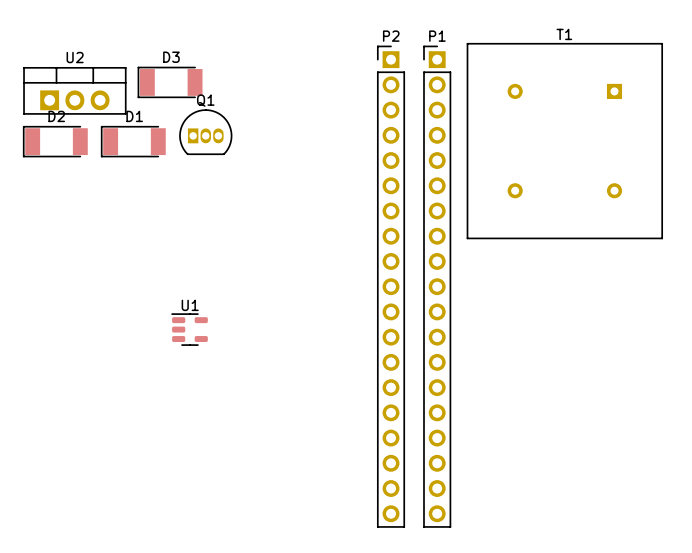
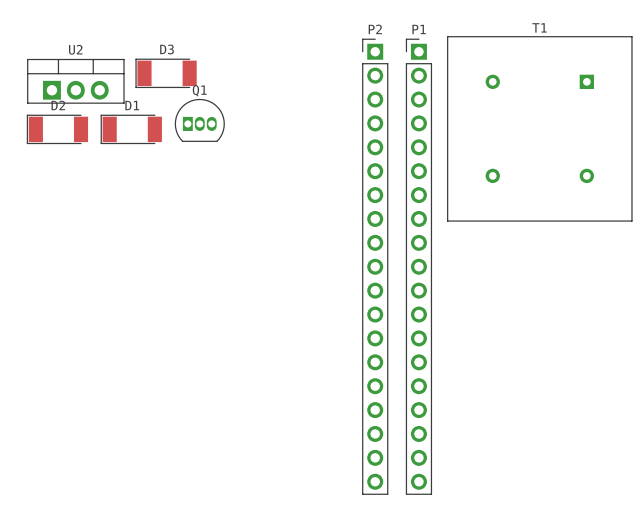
U1: (189, 329) -> none

